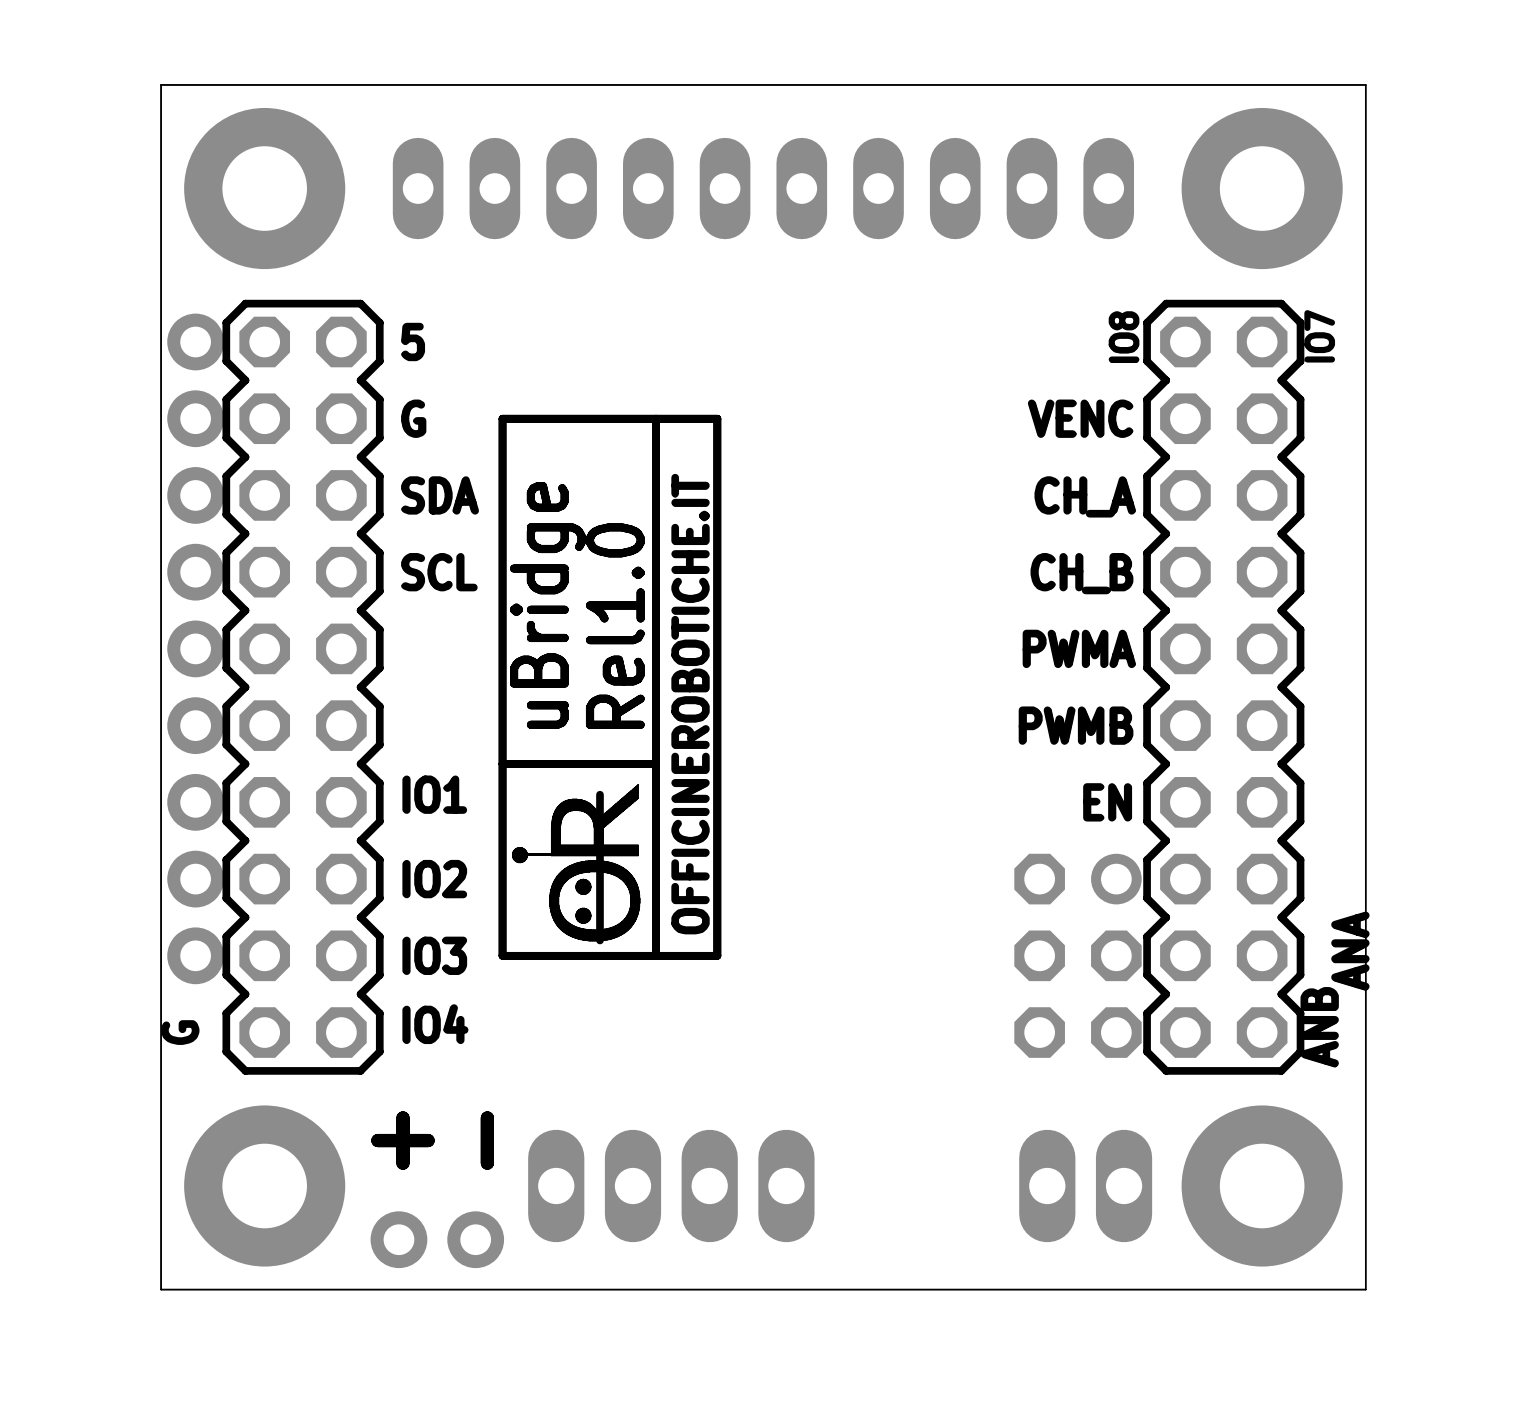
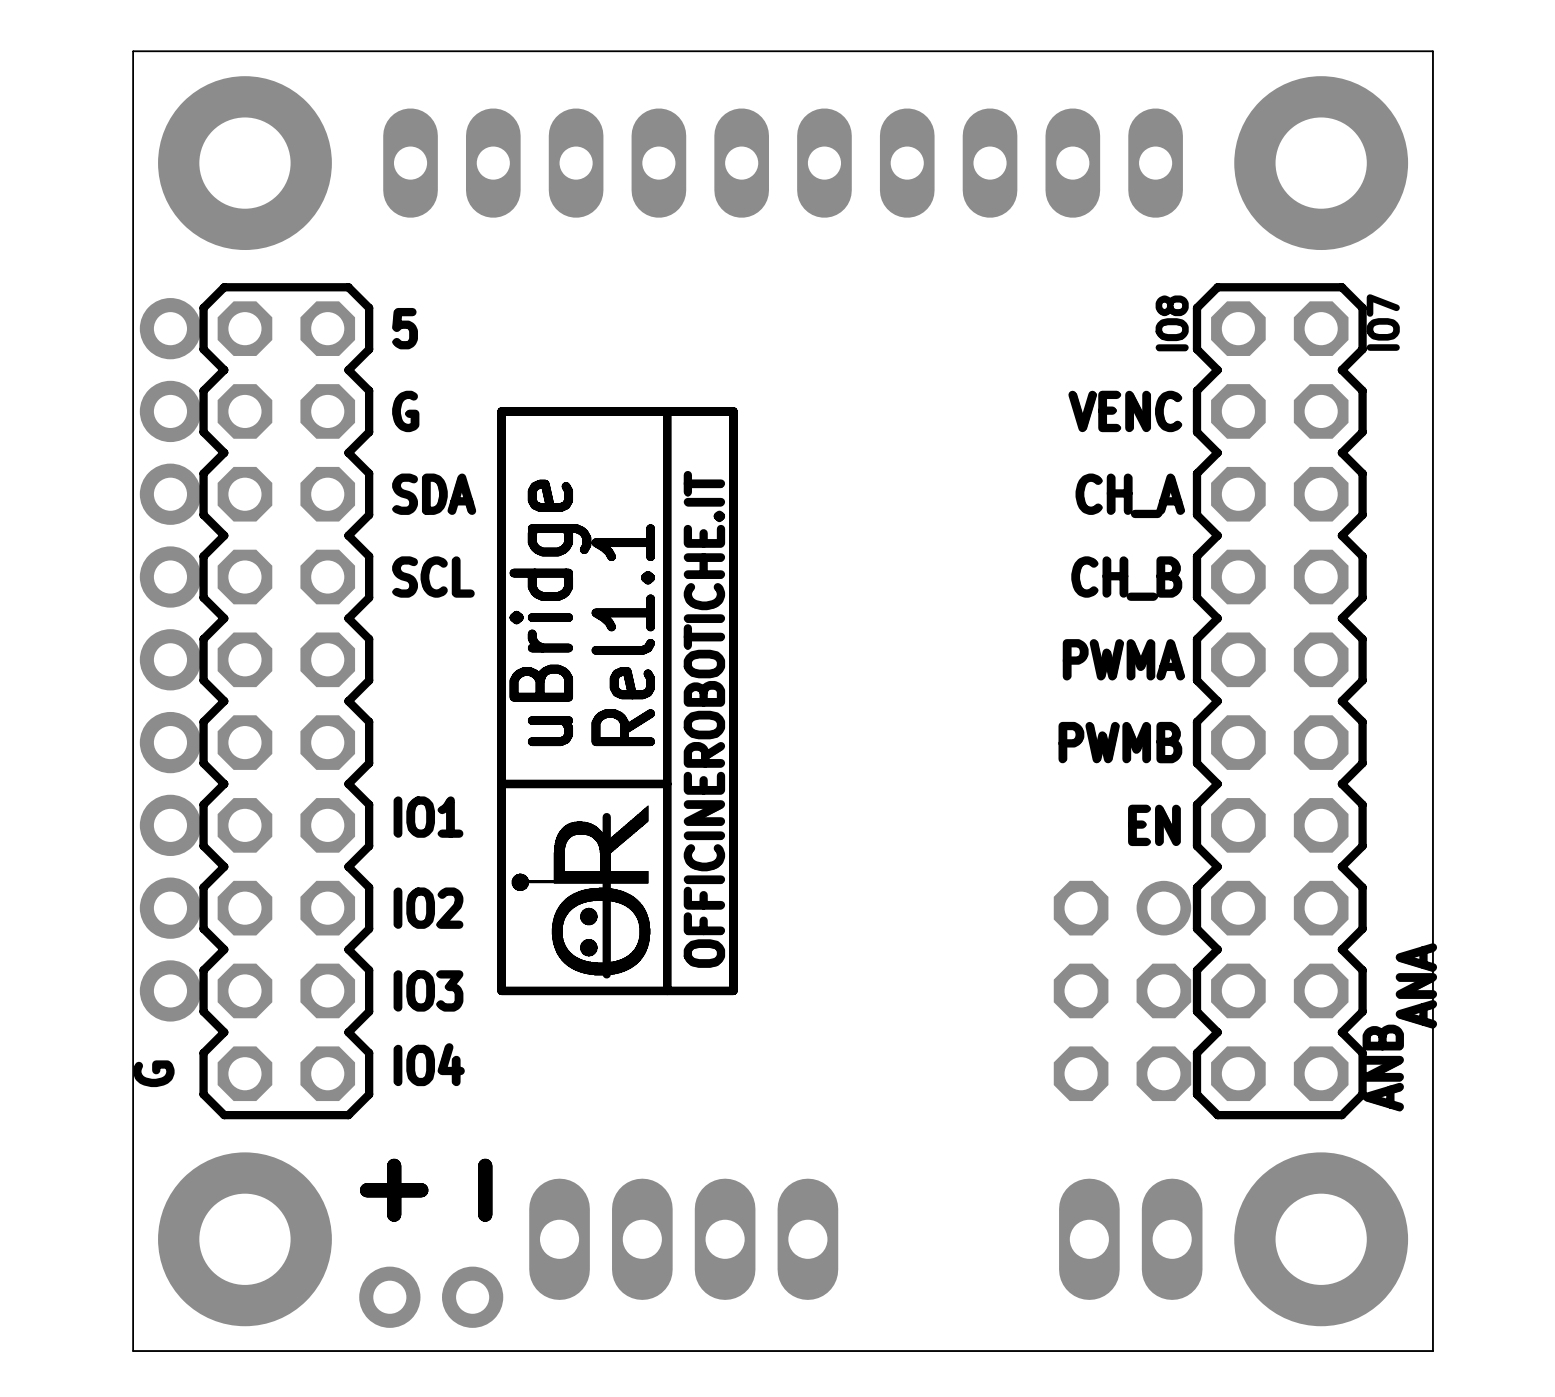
text: Rel1.0 (615, 626) -> Rel1.1 (623, 635)

